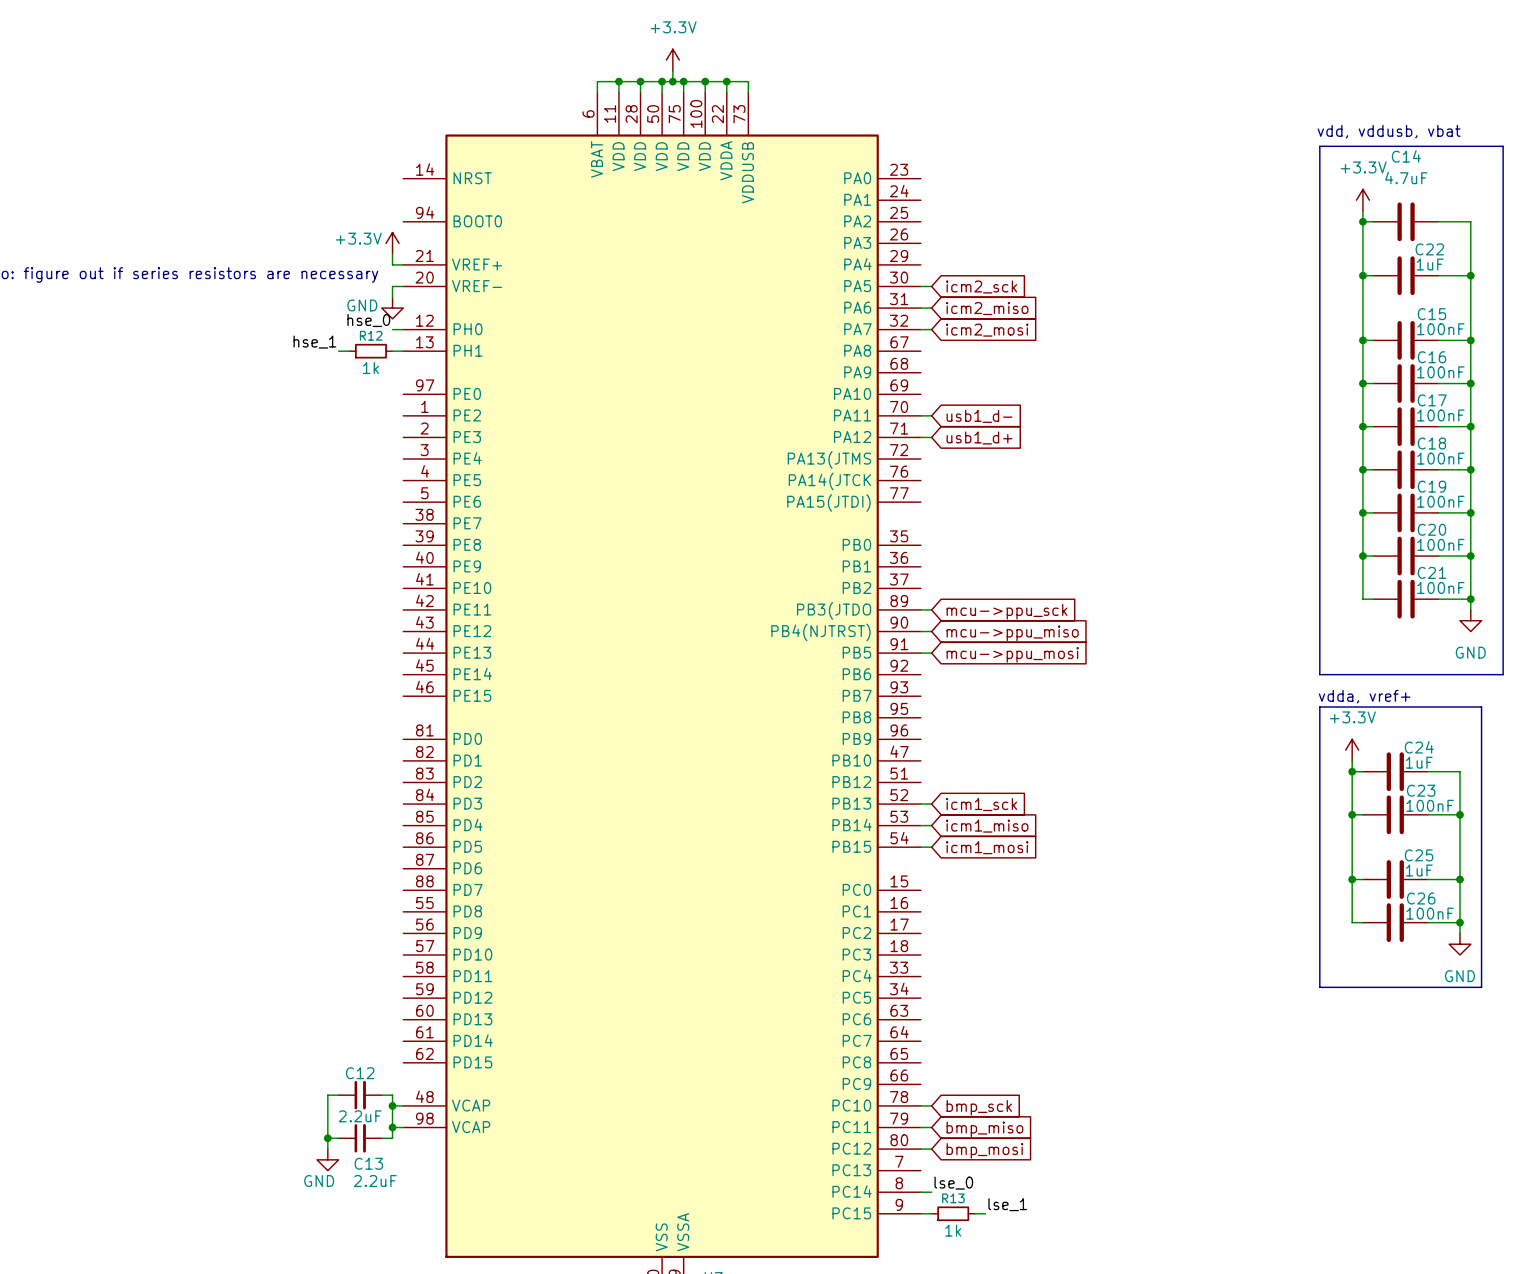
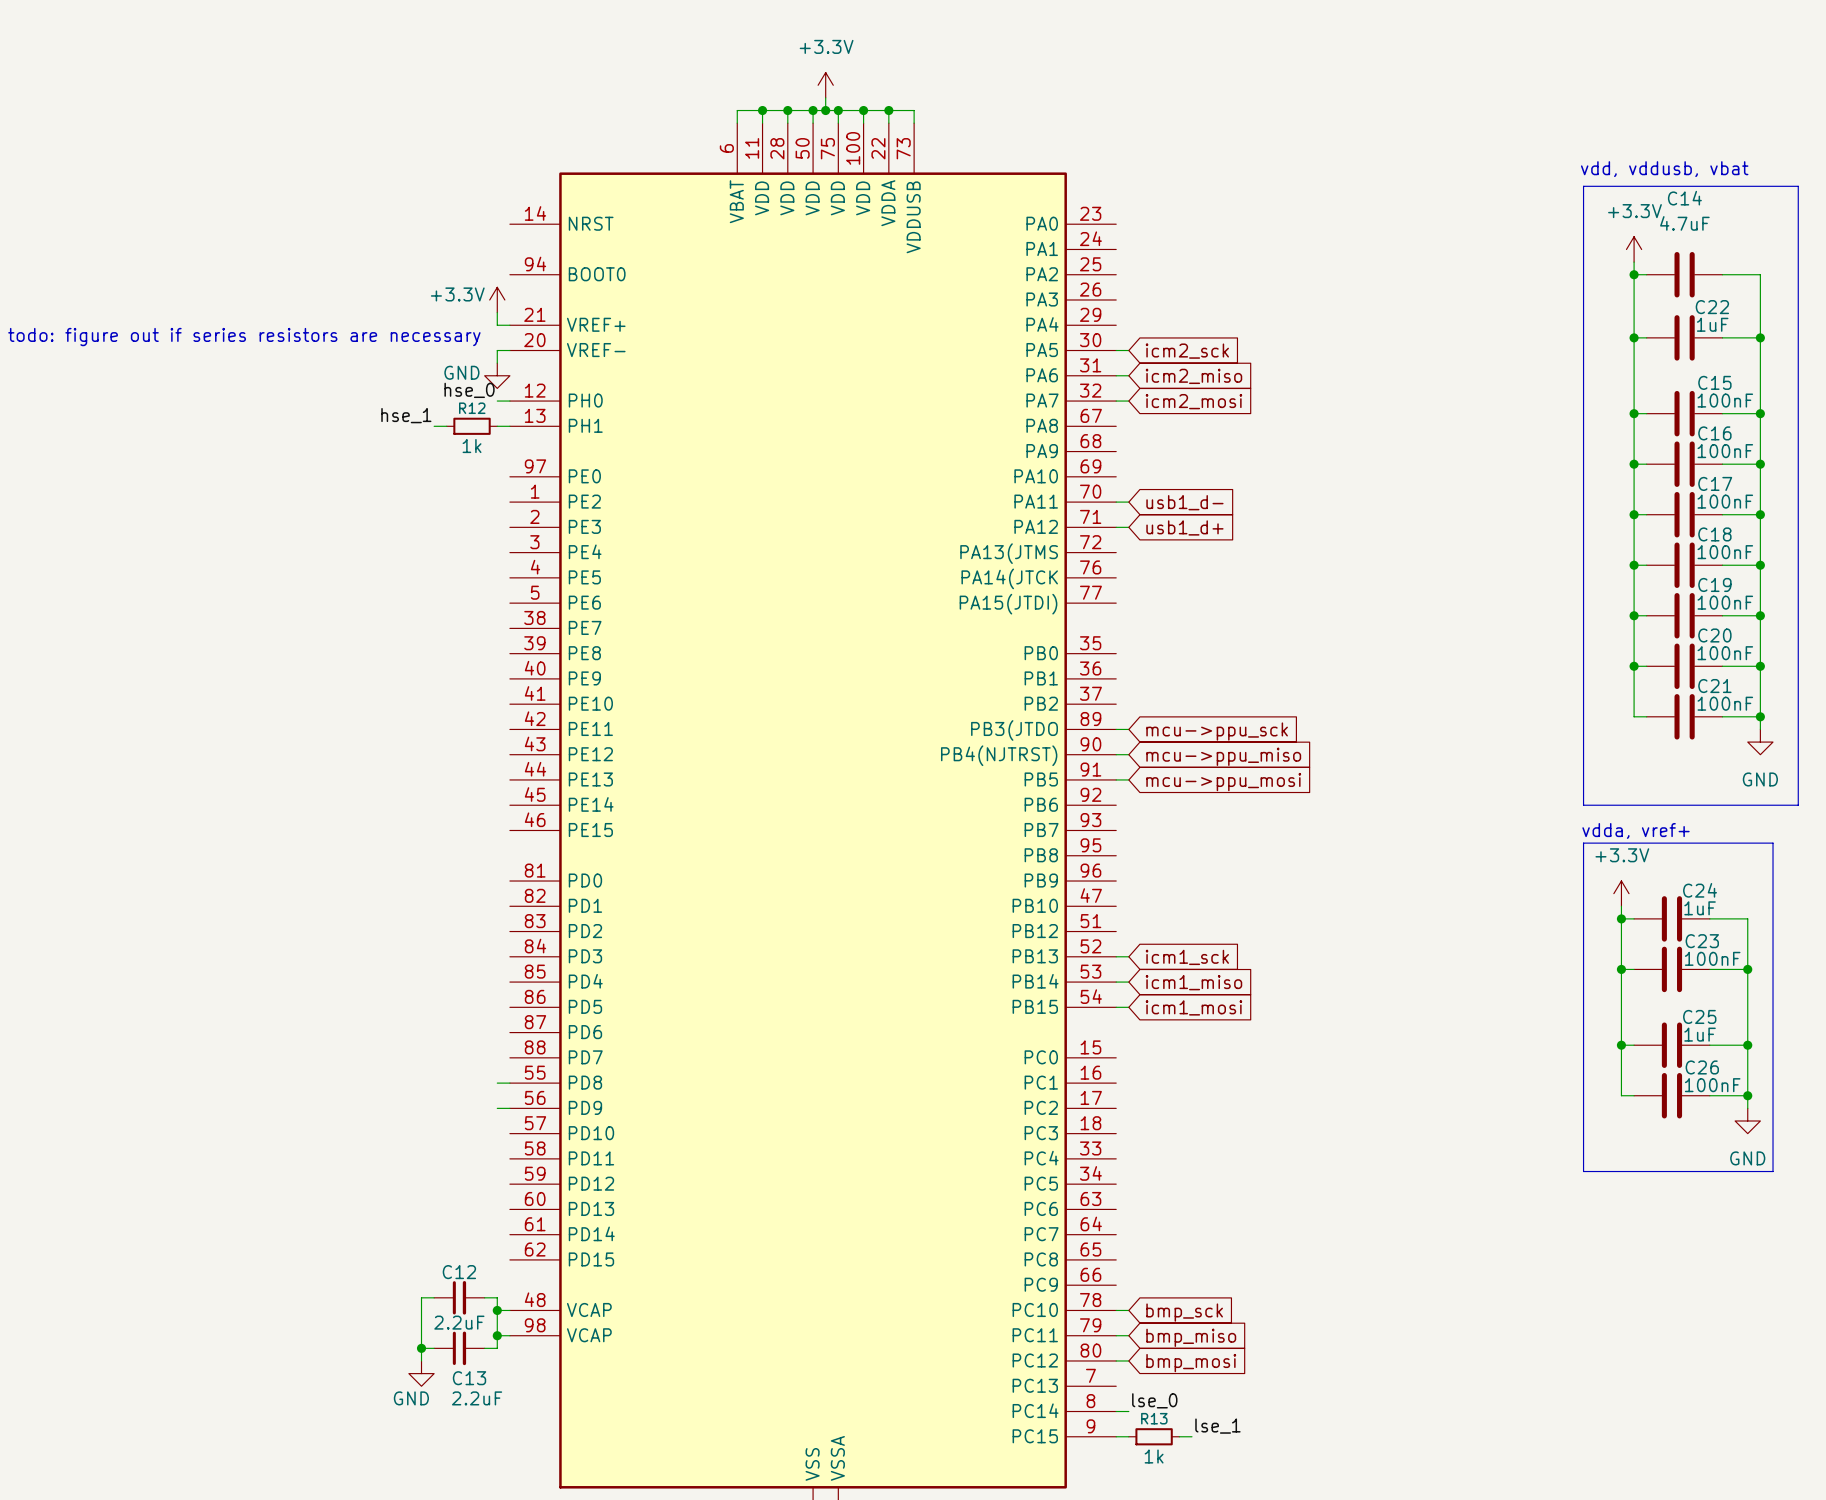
wire: none -> (497, 1083) (509, 1083)
wire: none -> (497, 1108) (509, 1108)

